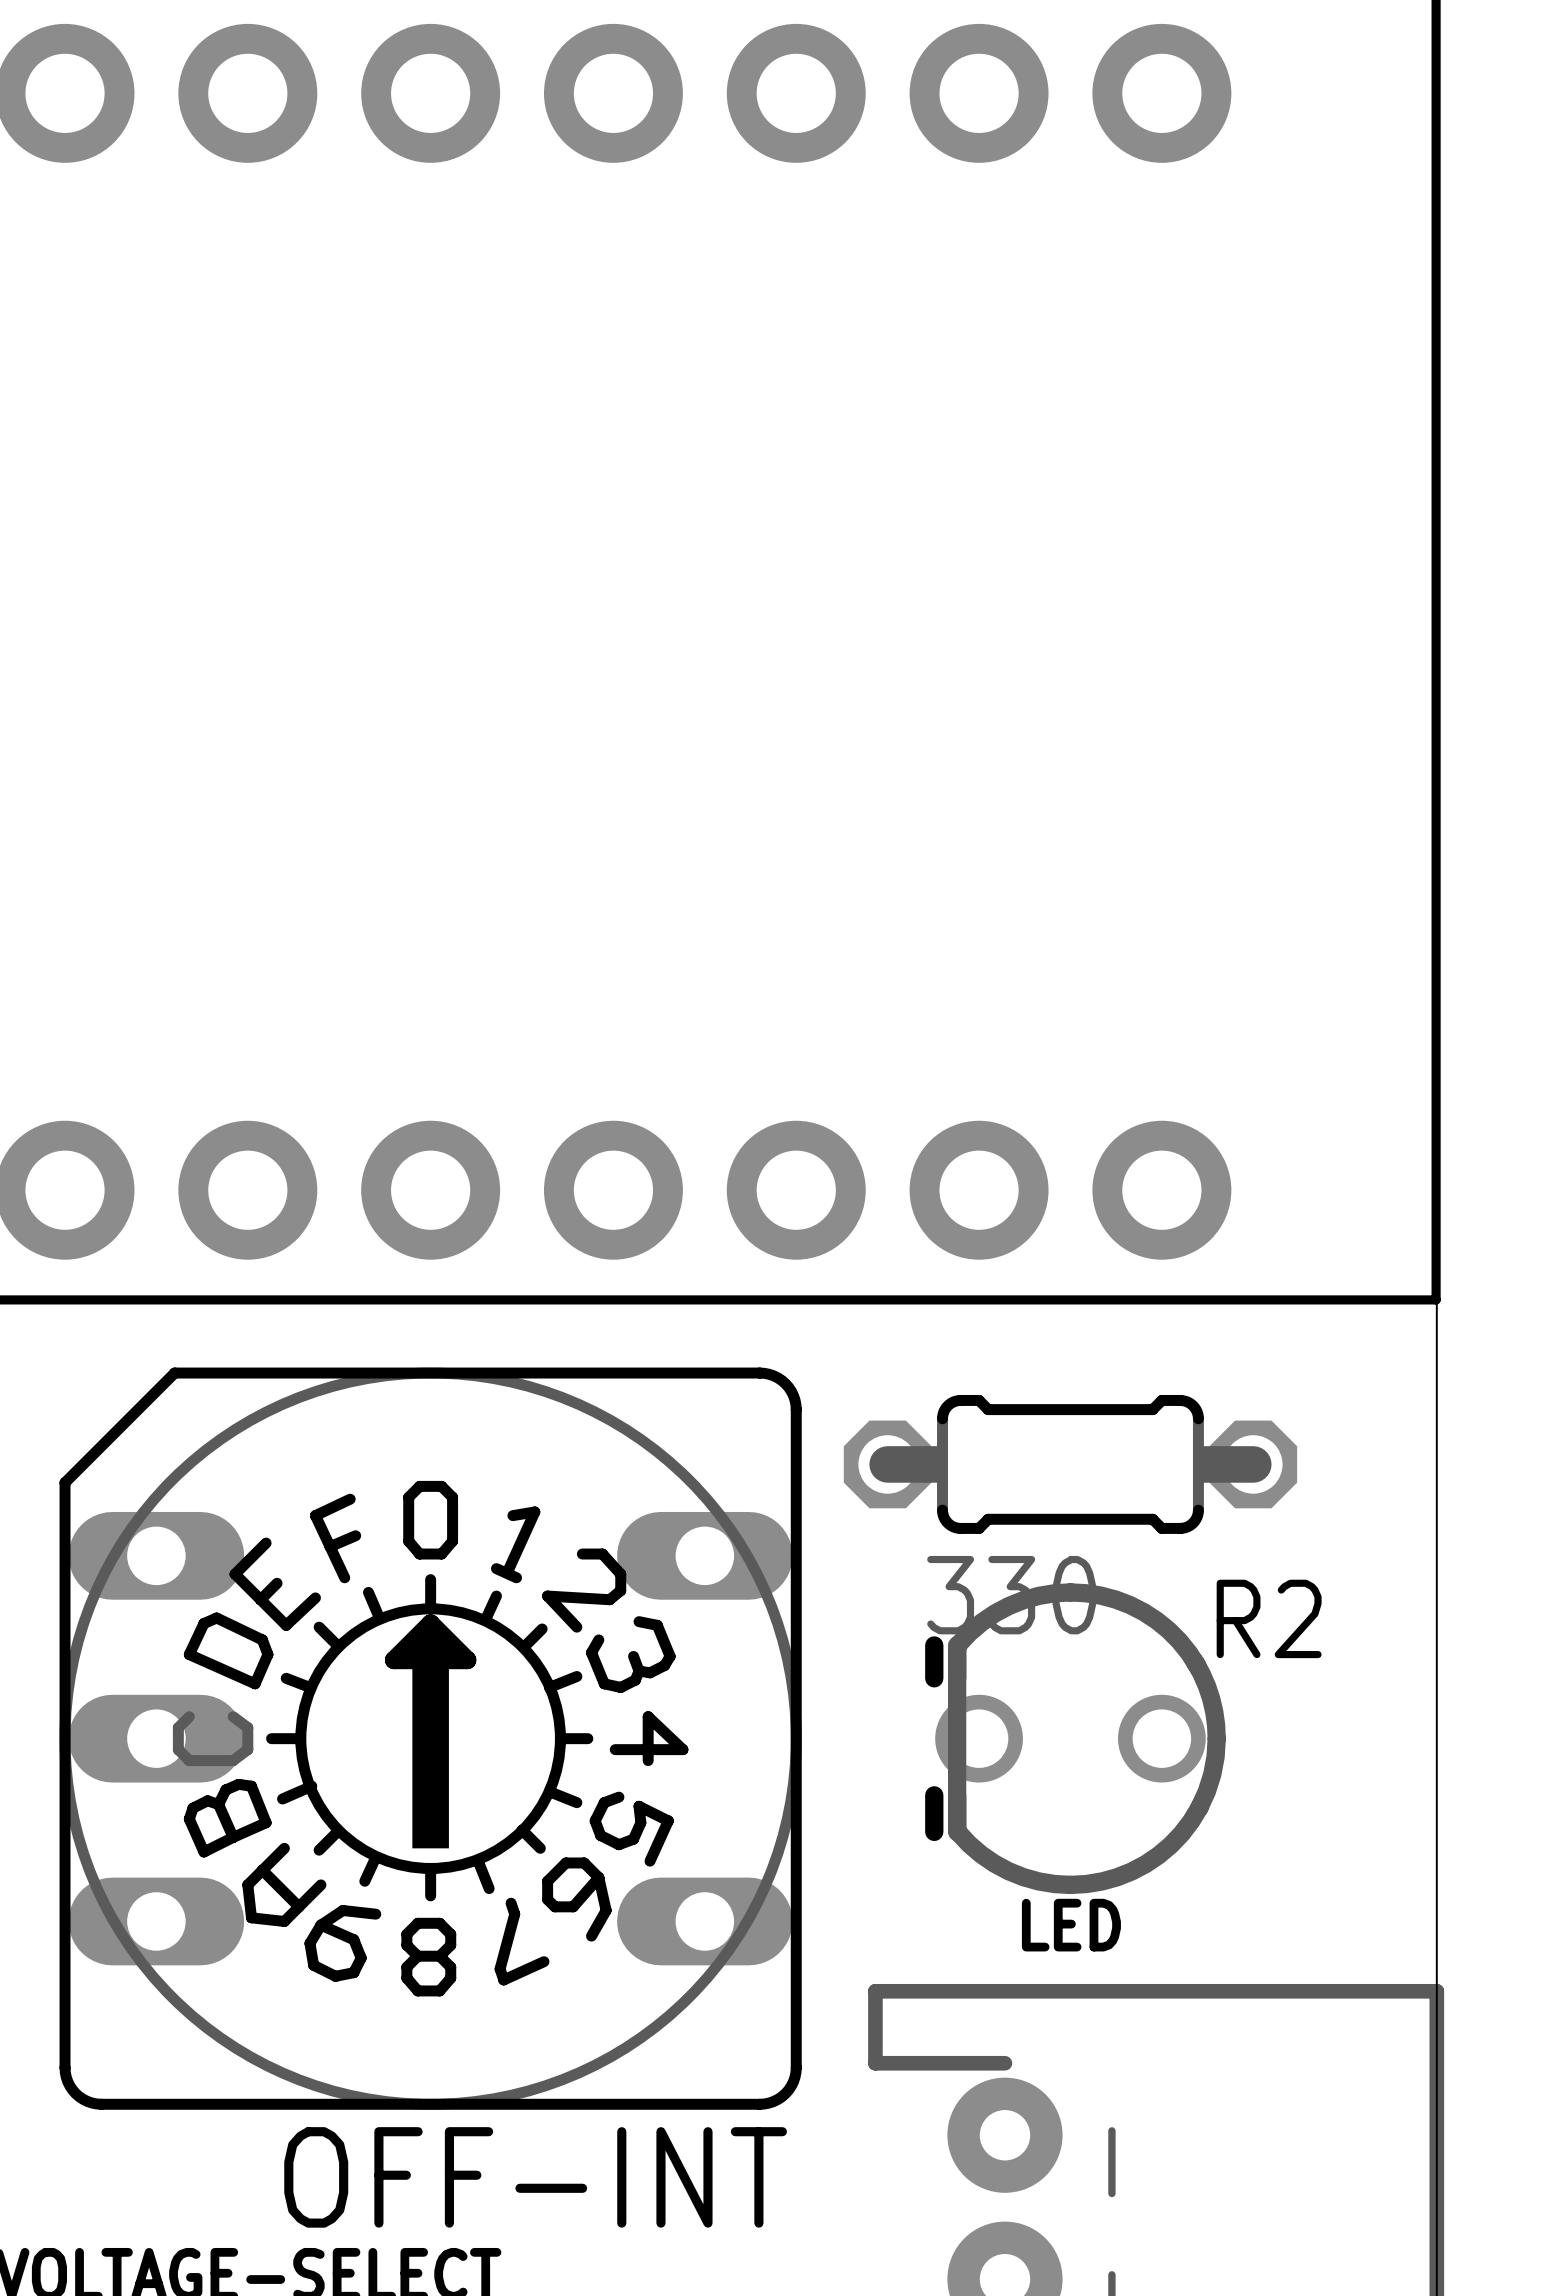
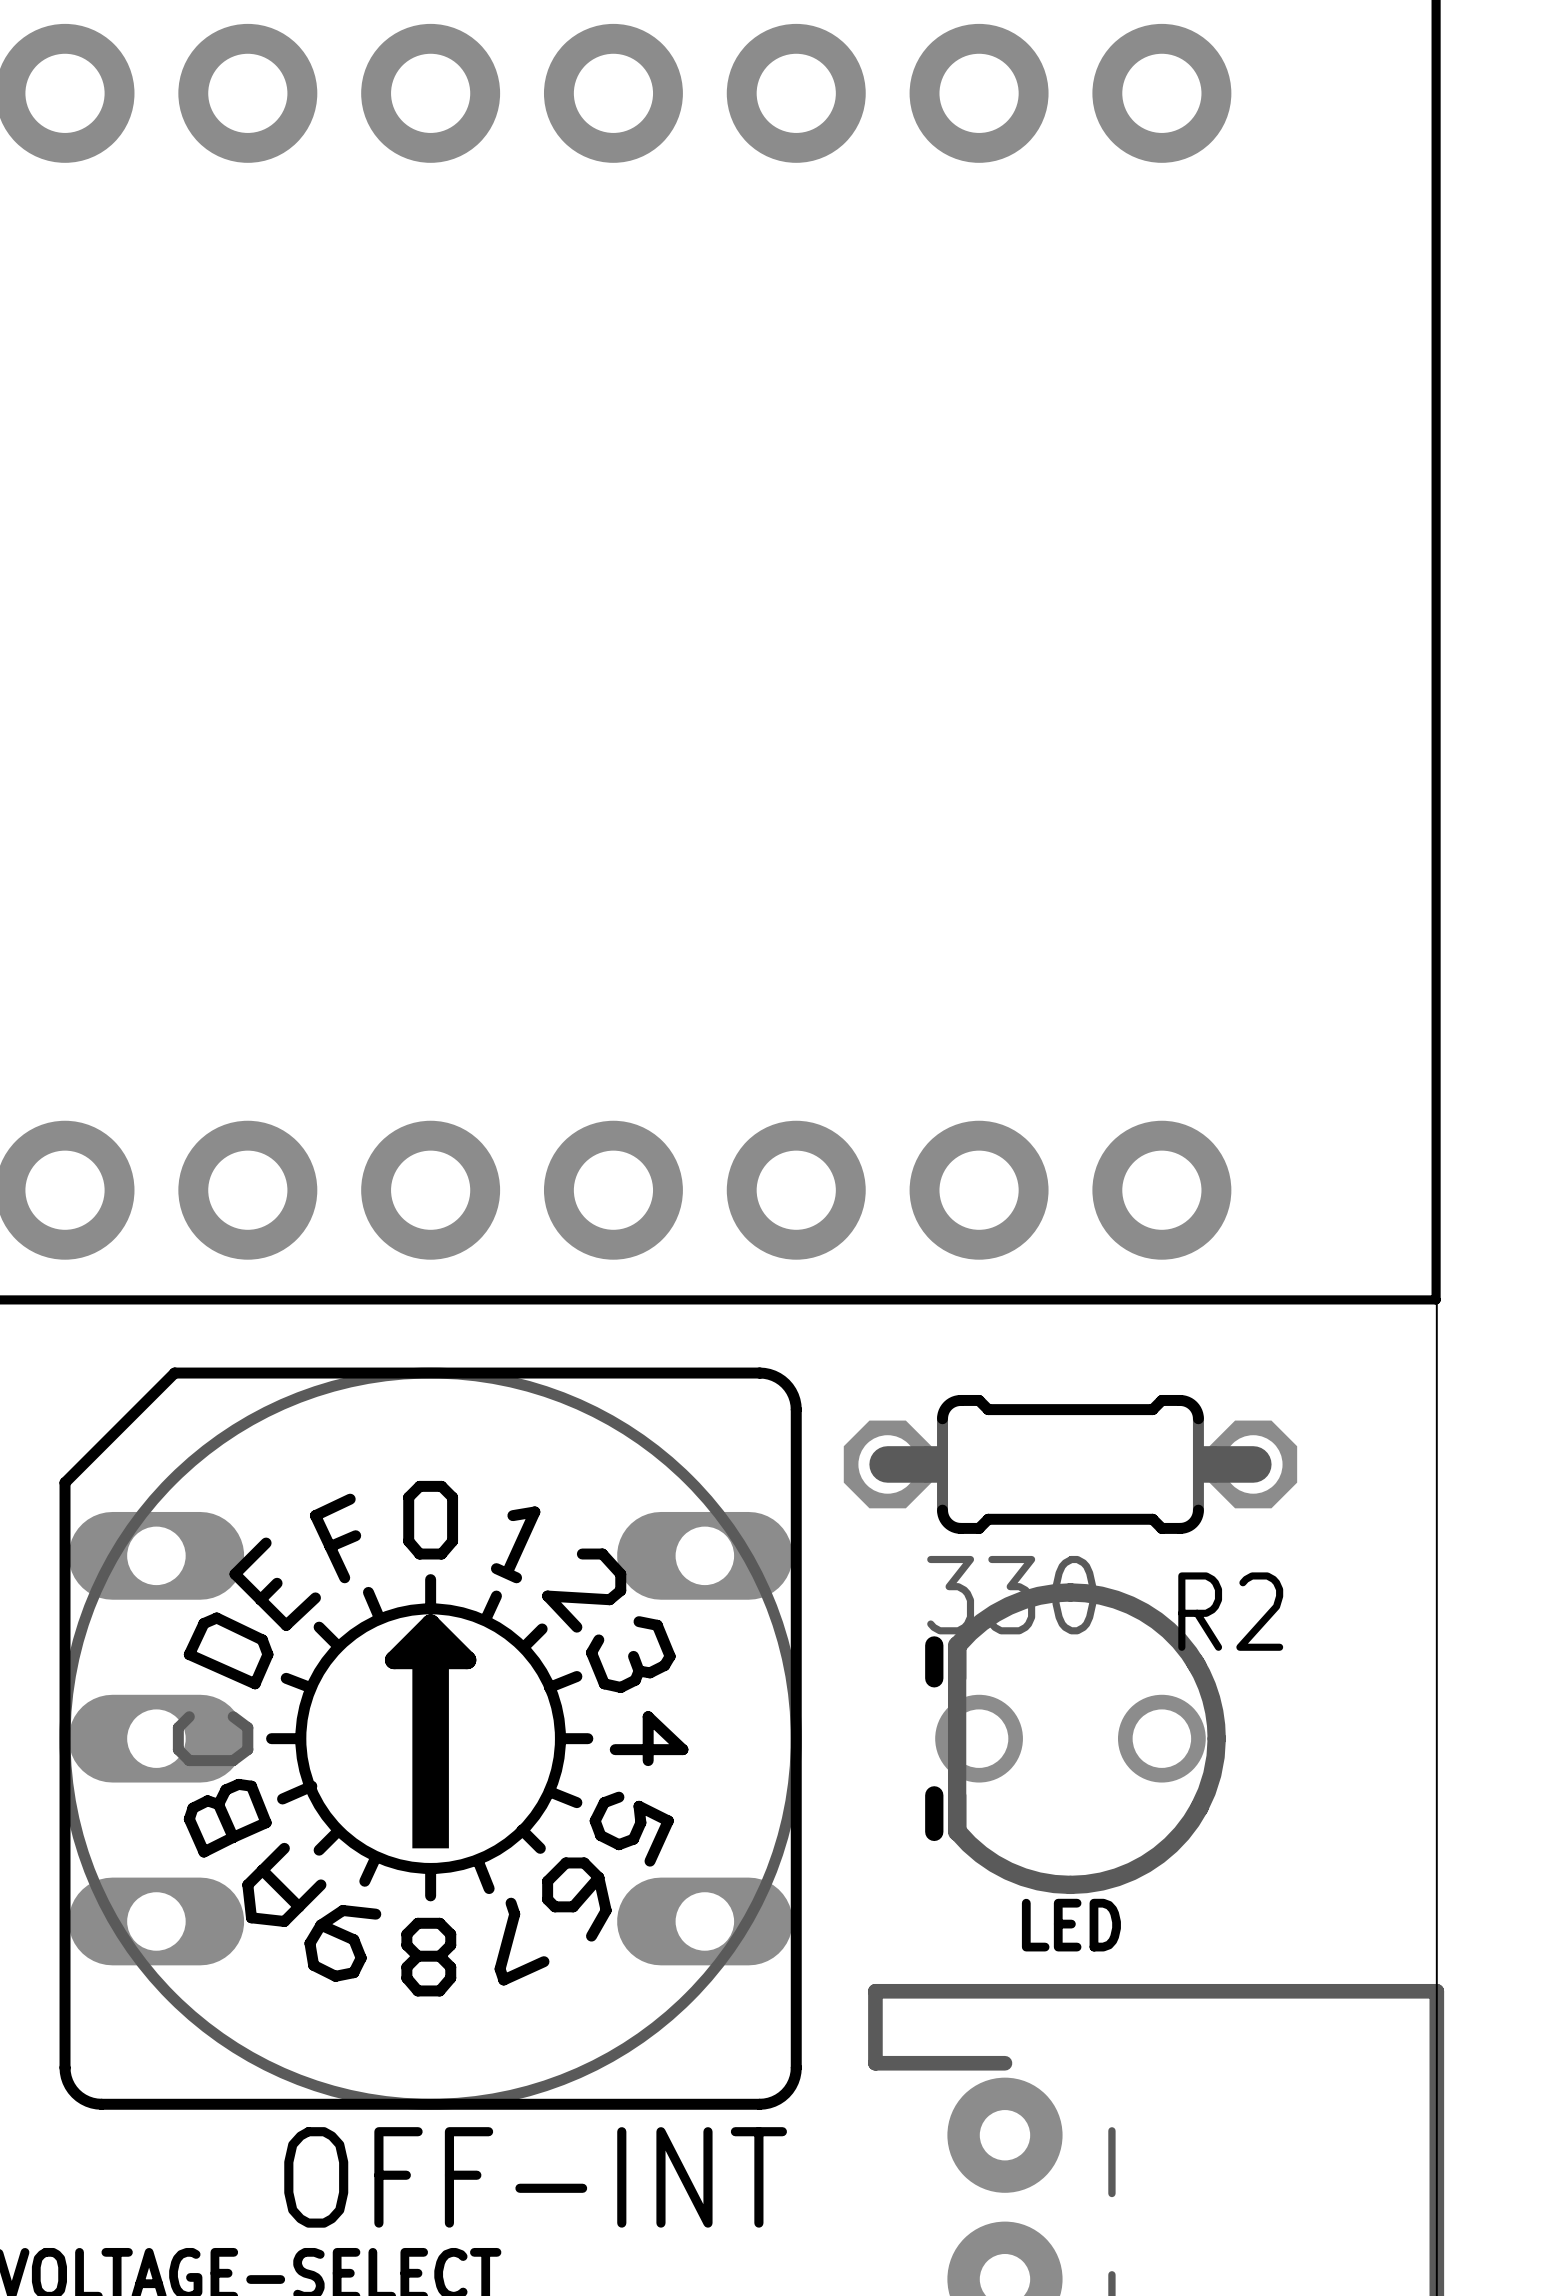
R2 name position: R2 (1269, 1618) -> R2 (1230, 1611)

